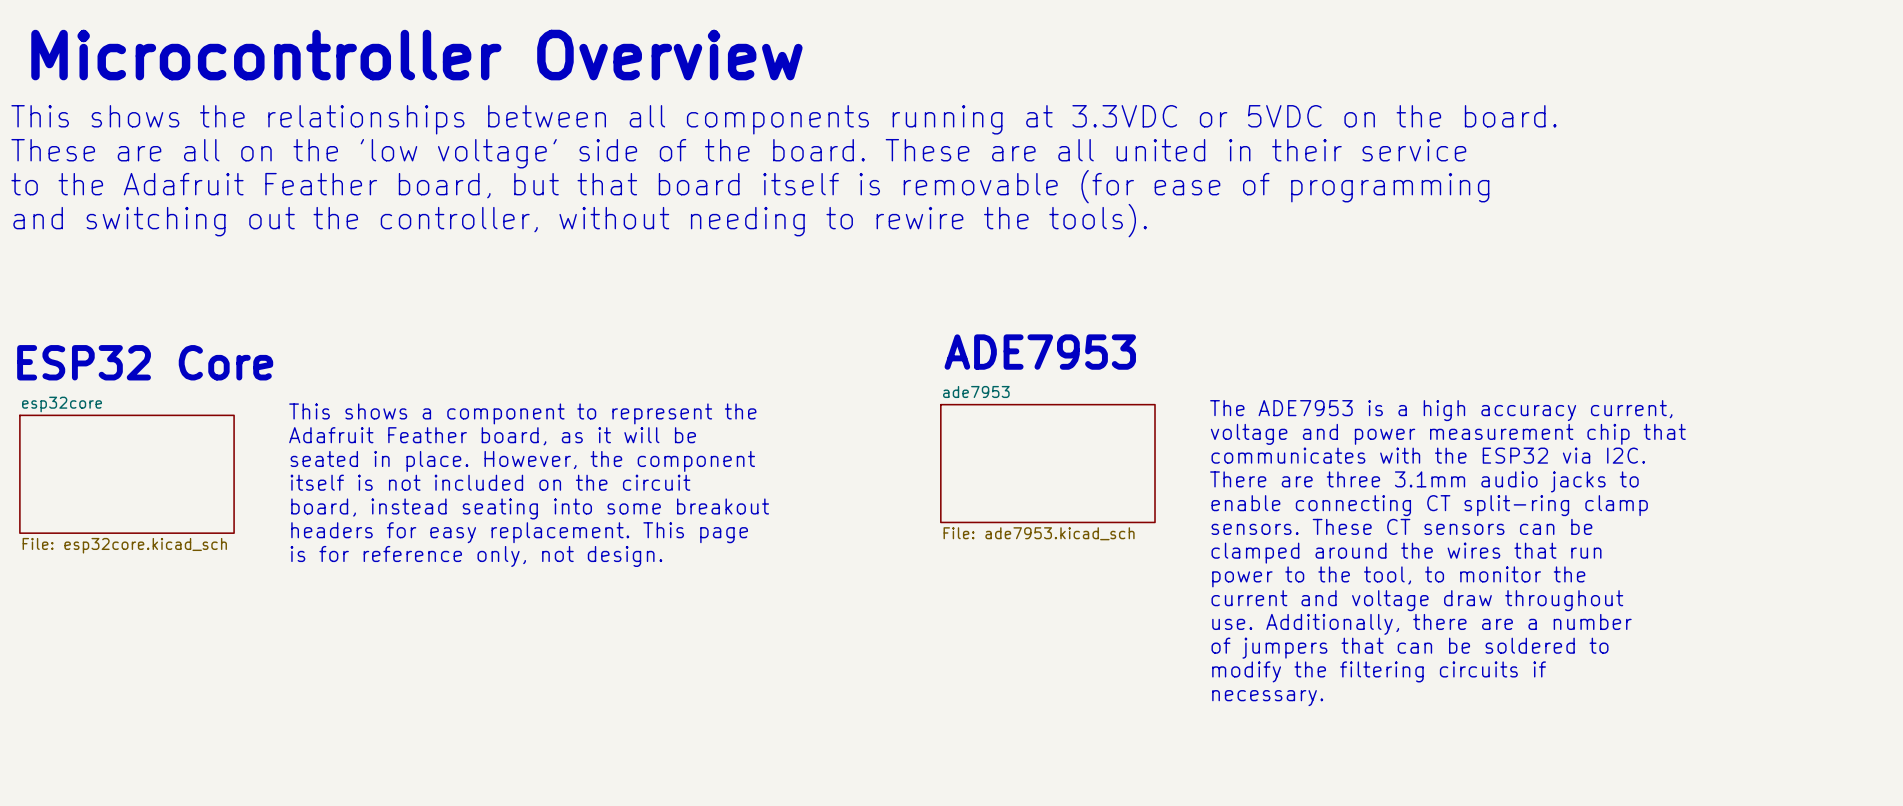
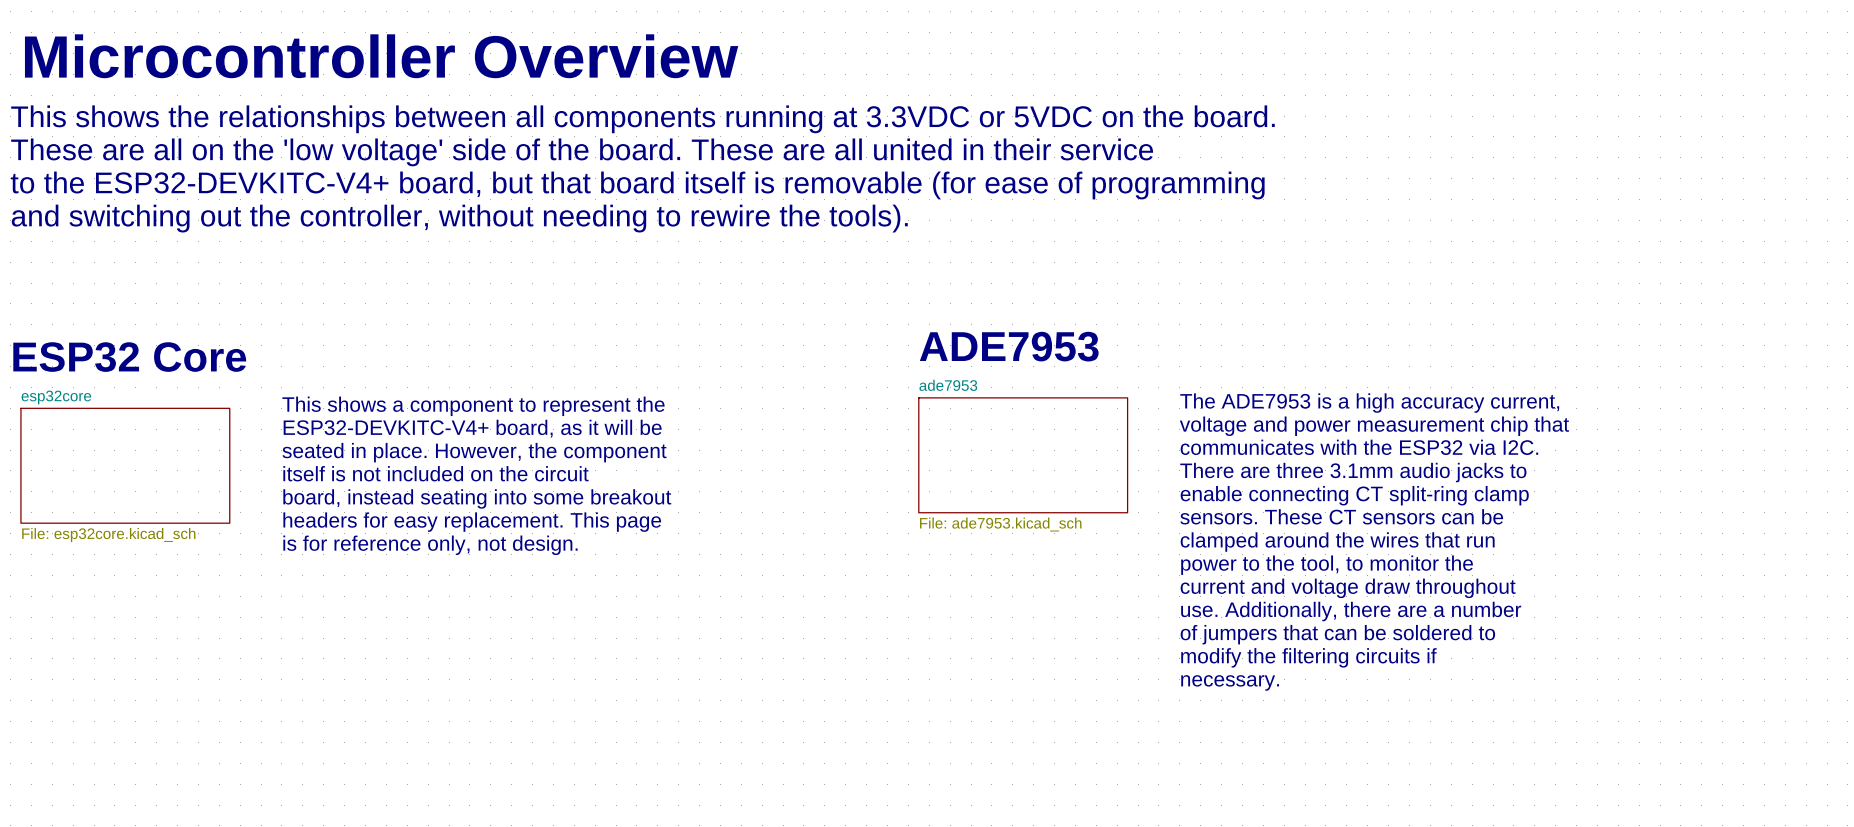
text: to the Adafruit Feather board, but that board itself is removable (for ease of programming (750, 186) -> to the ESP32-DEVKITC-V4+ board, but that board itself is removable (for ease of programming (637, 185)
text: Adafruit Feather board, as it will be (492, 436) -> ESP32-DEVKITC-V4+ board, as it will be (472, 428)

